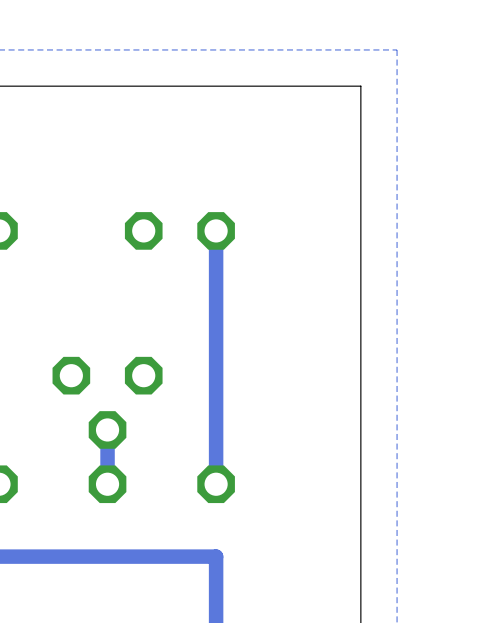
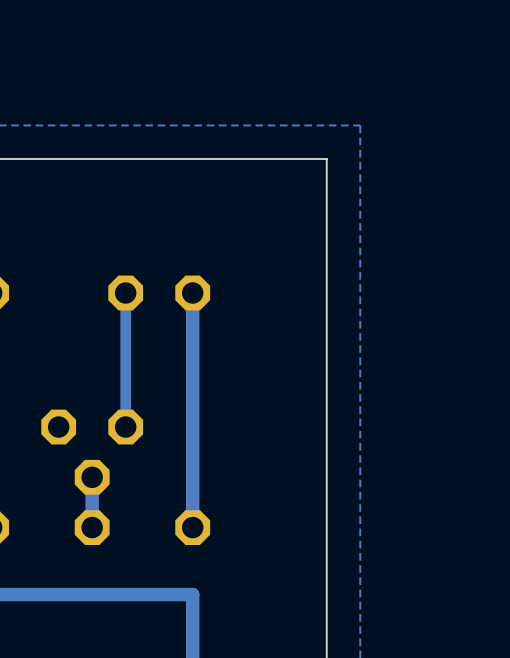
bottom track: none -> (125, 293) (125, 427)

